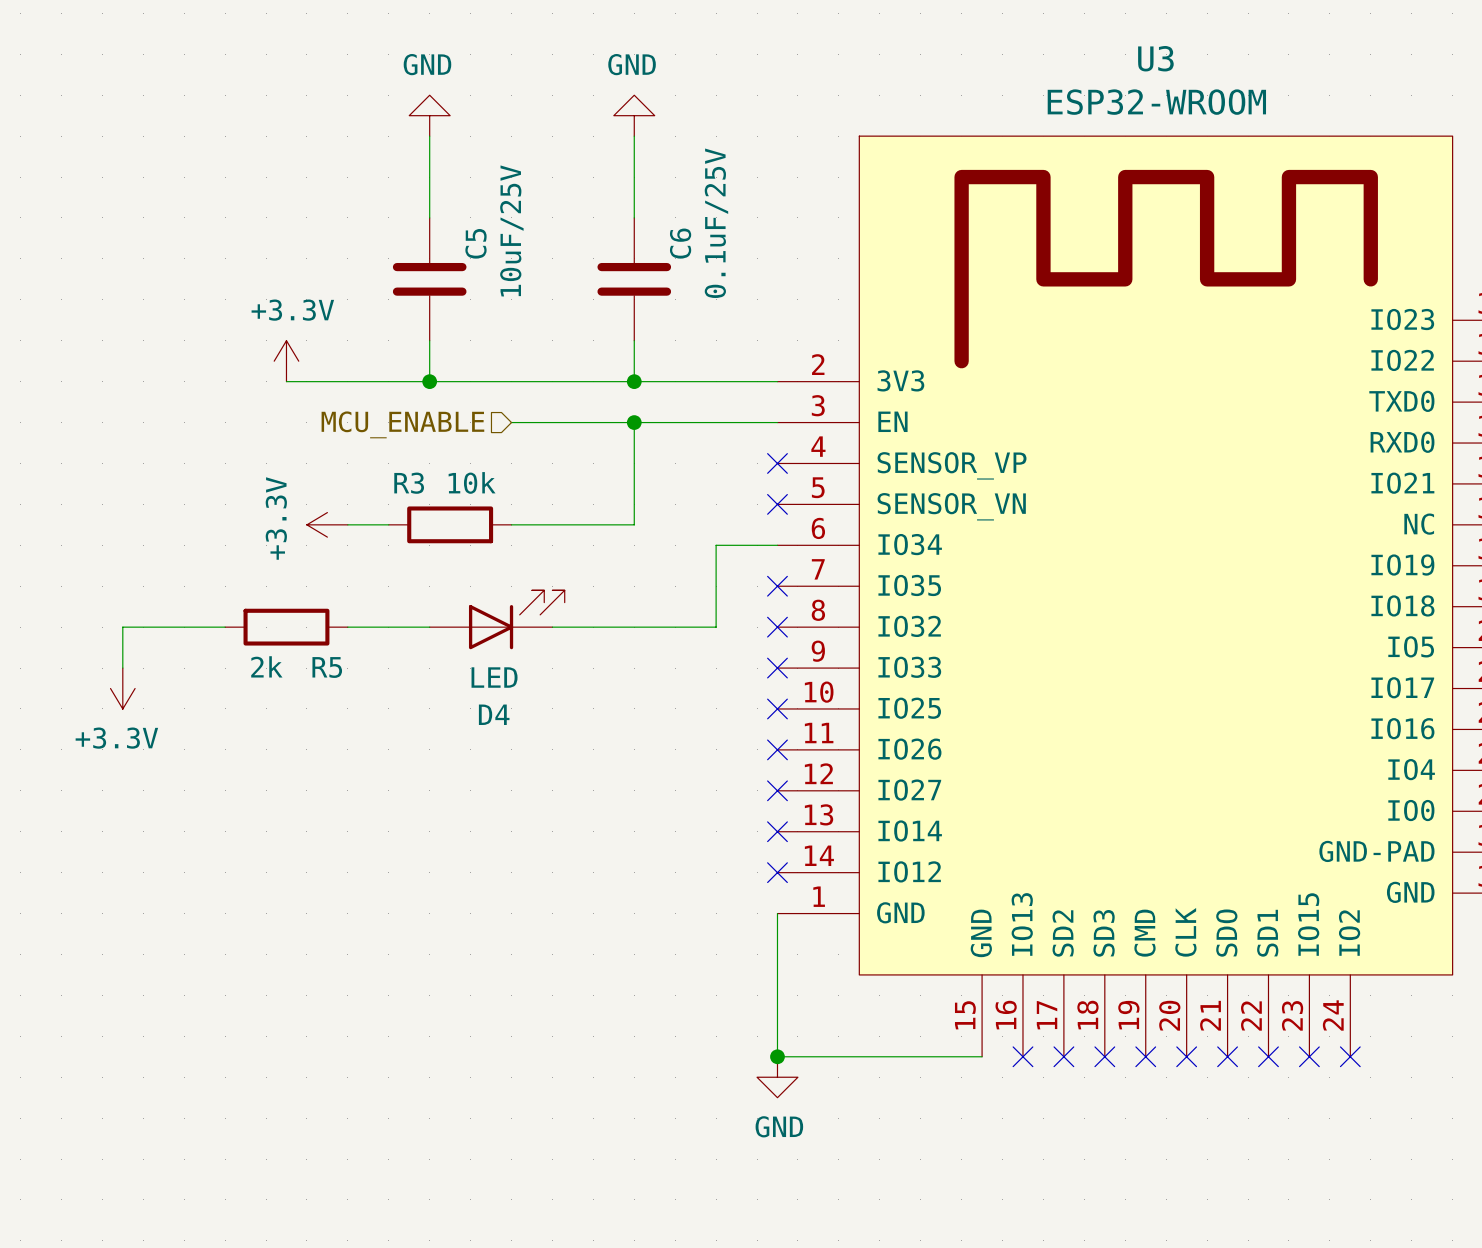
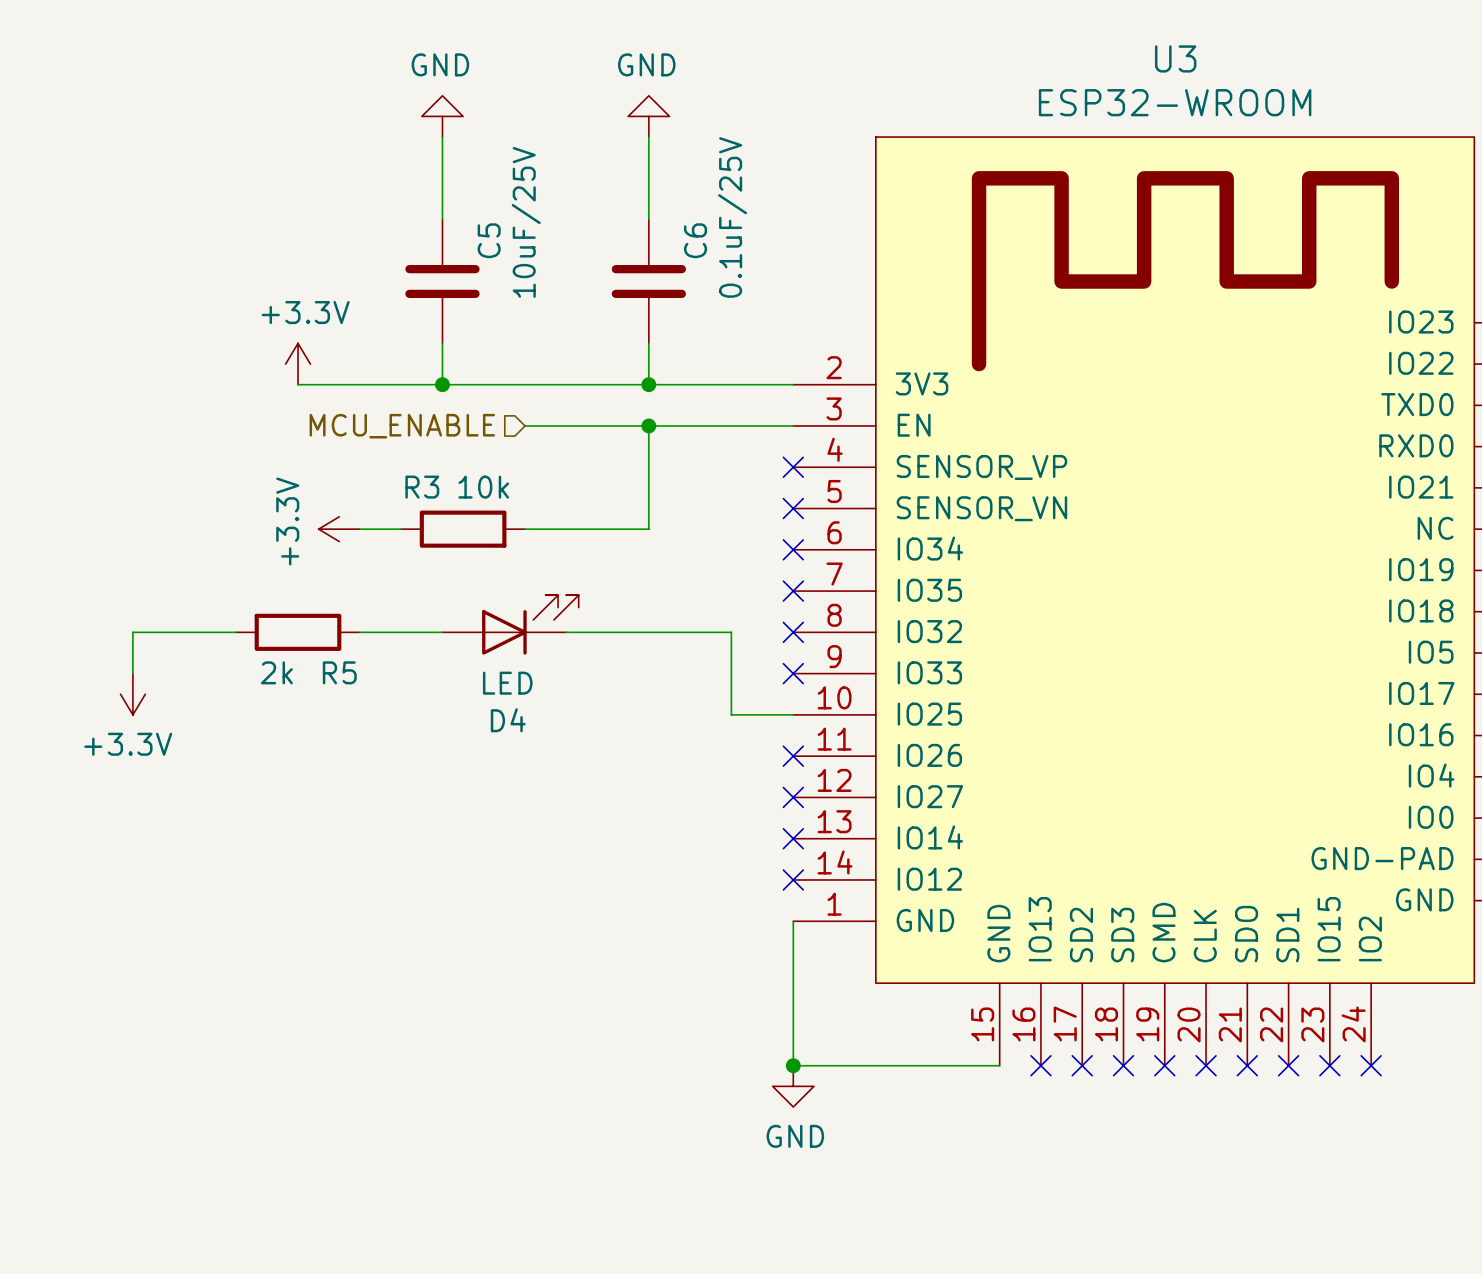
wire: (777, 545) (716, 545) (716, 627) -> (793, 714) (731, 714) (731, 632)
no-connect mark: none -> (793, 549)
no-connect mark: (777, 708) -> none

